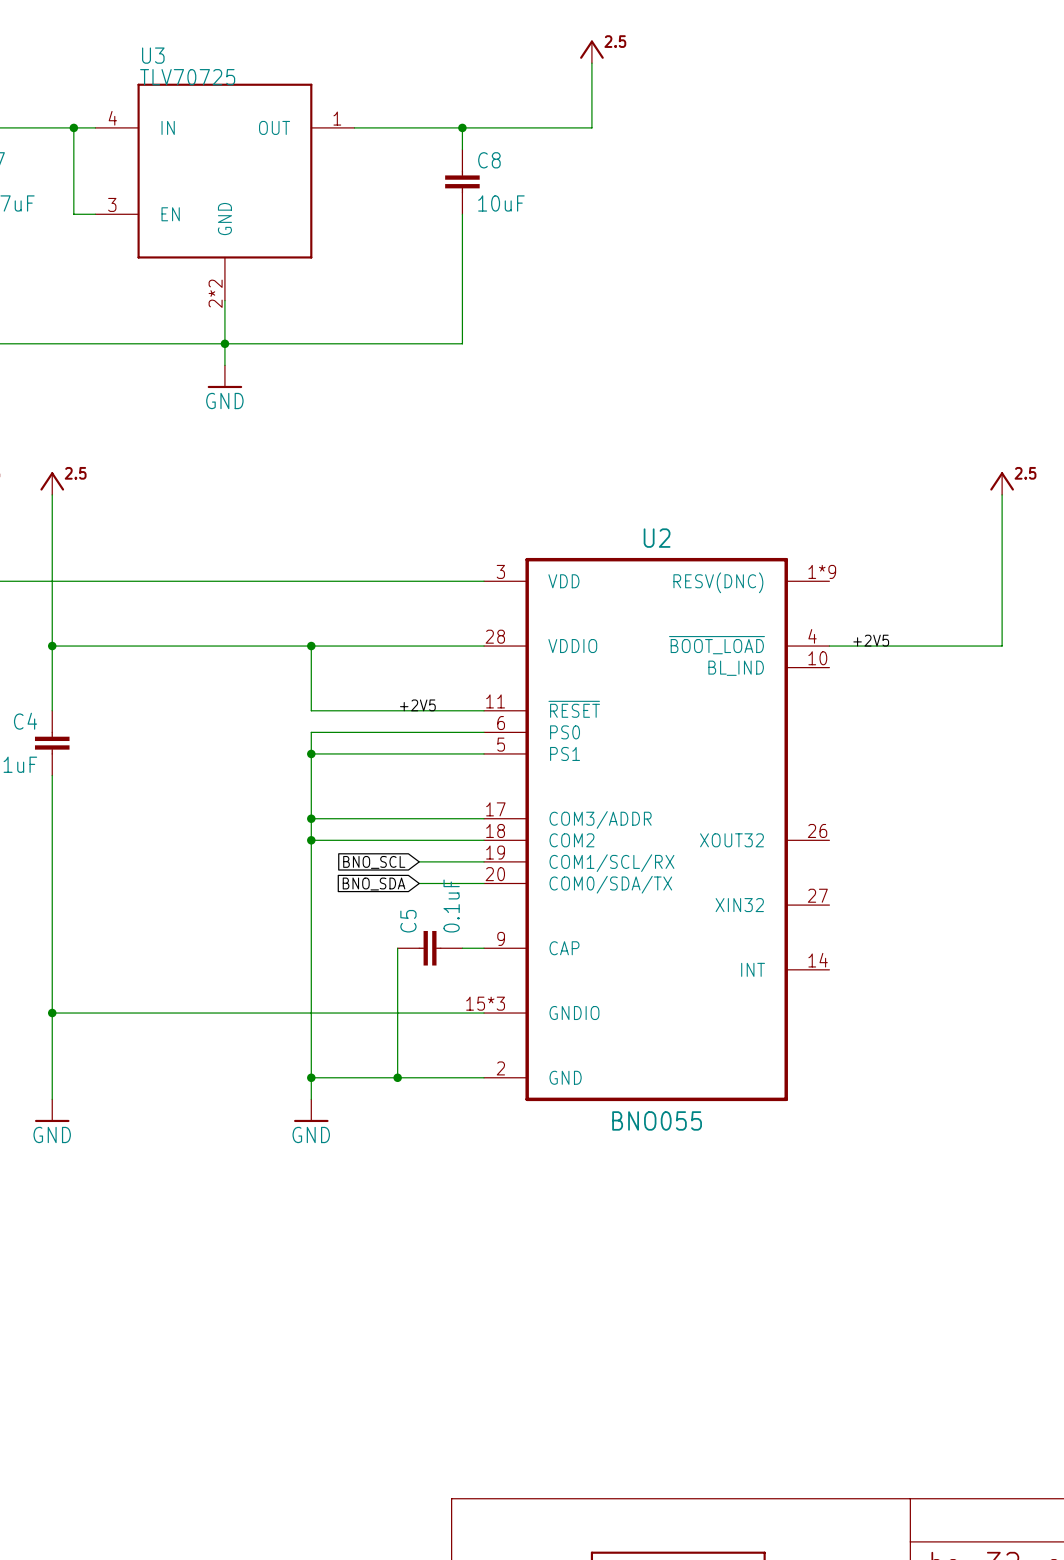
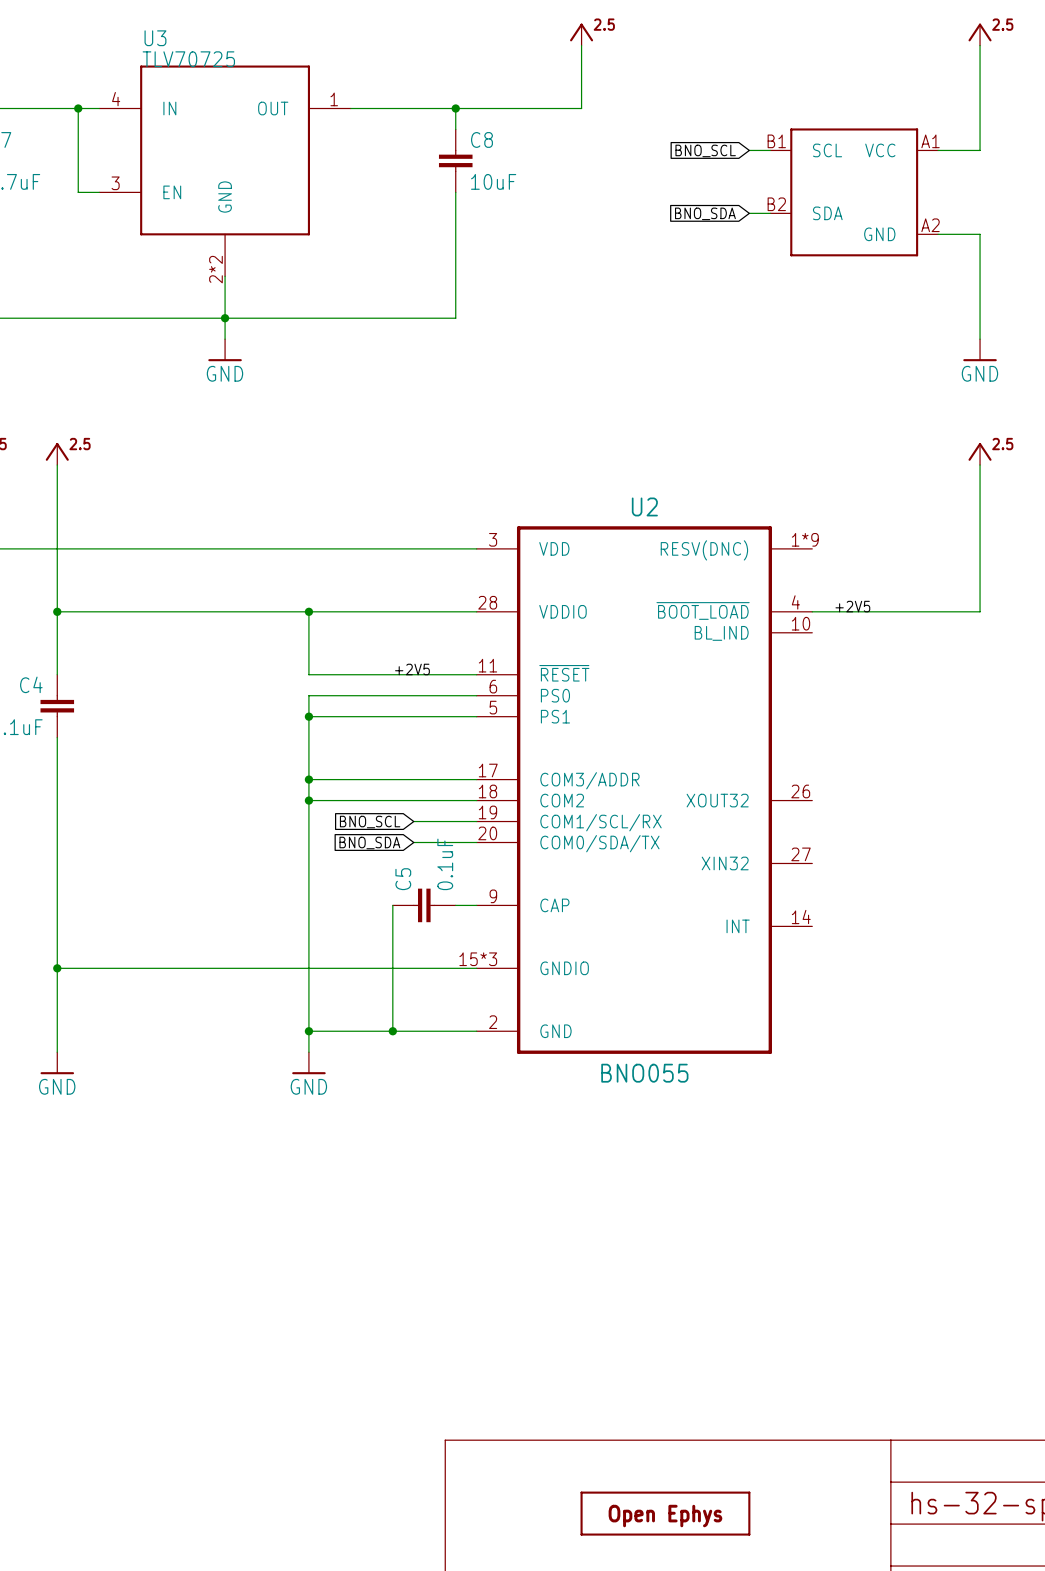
power symbol: none -> (980, 34)
wire: none -> (980, 45) (980, 150) (938, 150)
global label: none -> BNO_SCL (705, 150)
wire: none -> (749, 150) (770, 150)
part: none -> (854, 192)
wire: none -> (749, 213) (770, 213)
global label: none -> BNO_SDA (705, 213)
wire: none -> (938, 234) (980, 234) (980, 339)
power symbol: none -> GND (980, 350)

